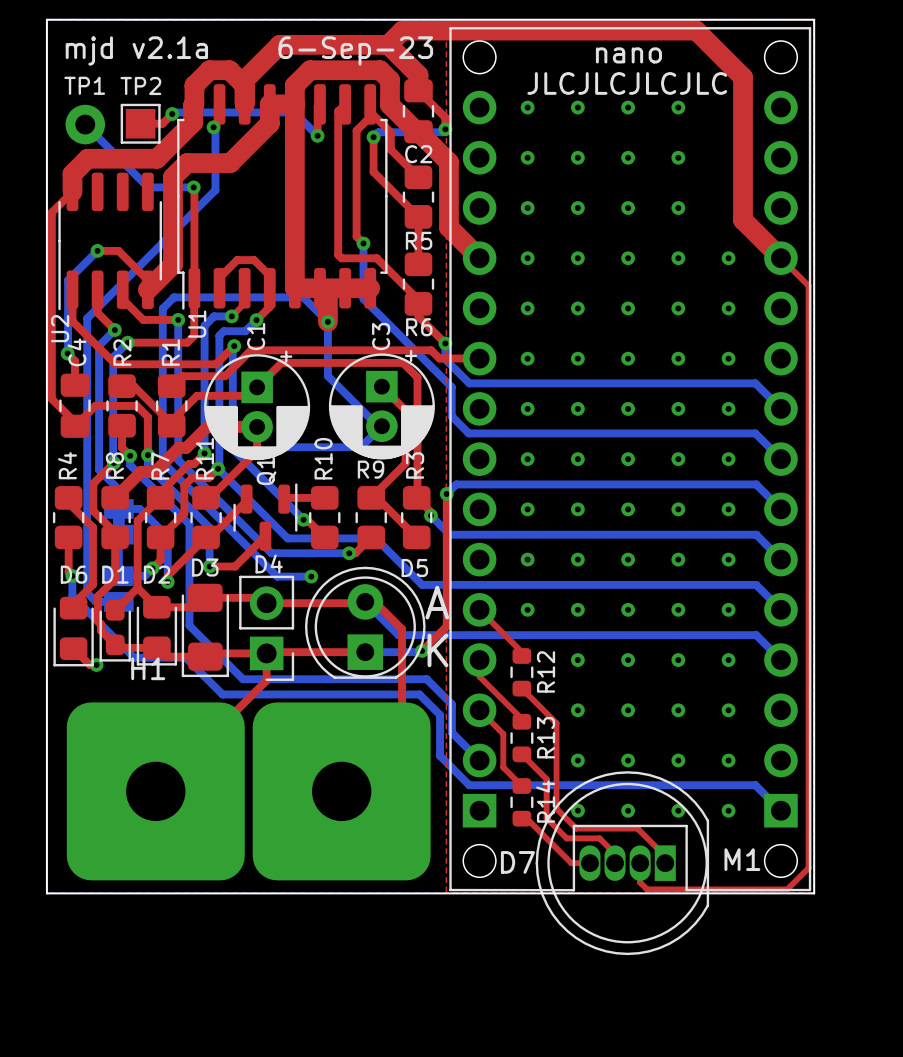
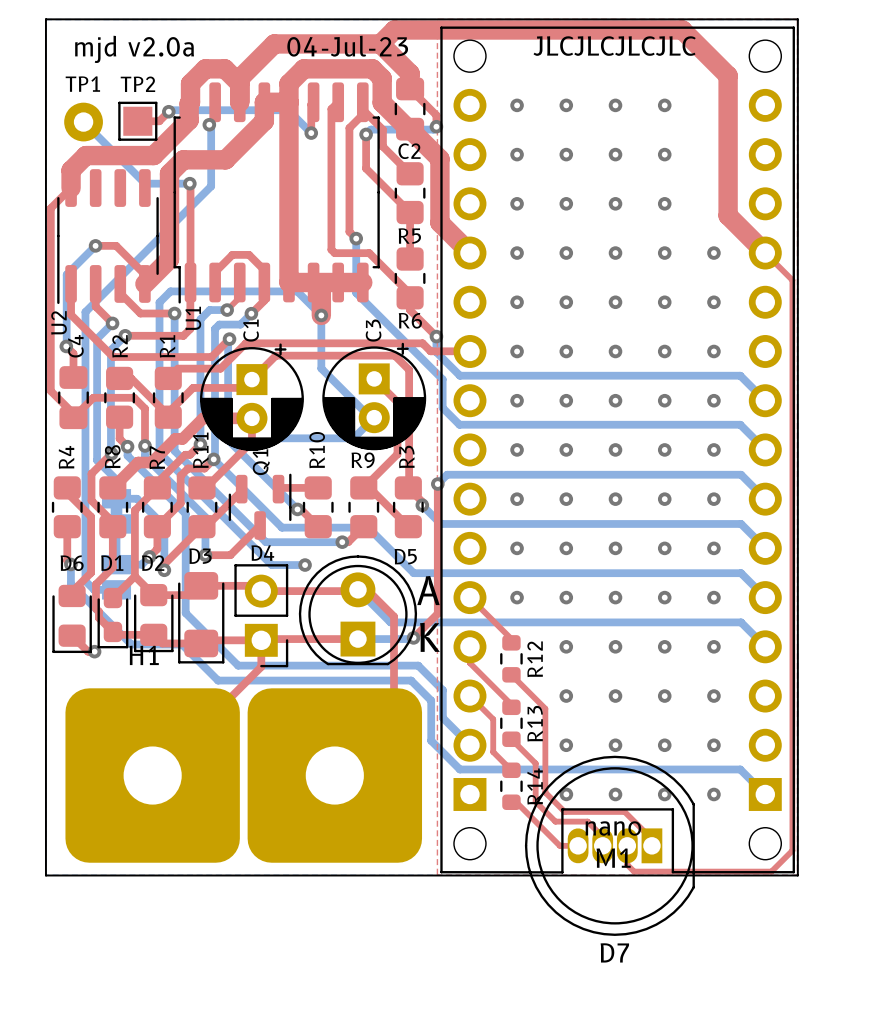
text: mjd v2.1a (136, 50) -> mjd v2.0a (134, 49)
text: 6-Sep-23 (355, 50) -> 04-Jul-23 (347, 46)
text: nano (628, 55) -> none
text position: JLCJLCJLCJLC (627, 83) -> JLCJLCJLCJLC (614, 46)
text: none -> nano (613, 828)
M1 name position: M1 (742, 859) -> M1 (613, 858)
D7 name position: D7 (517, 862) -> D7 (614, 952)

